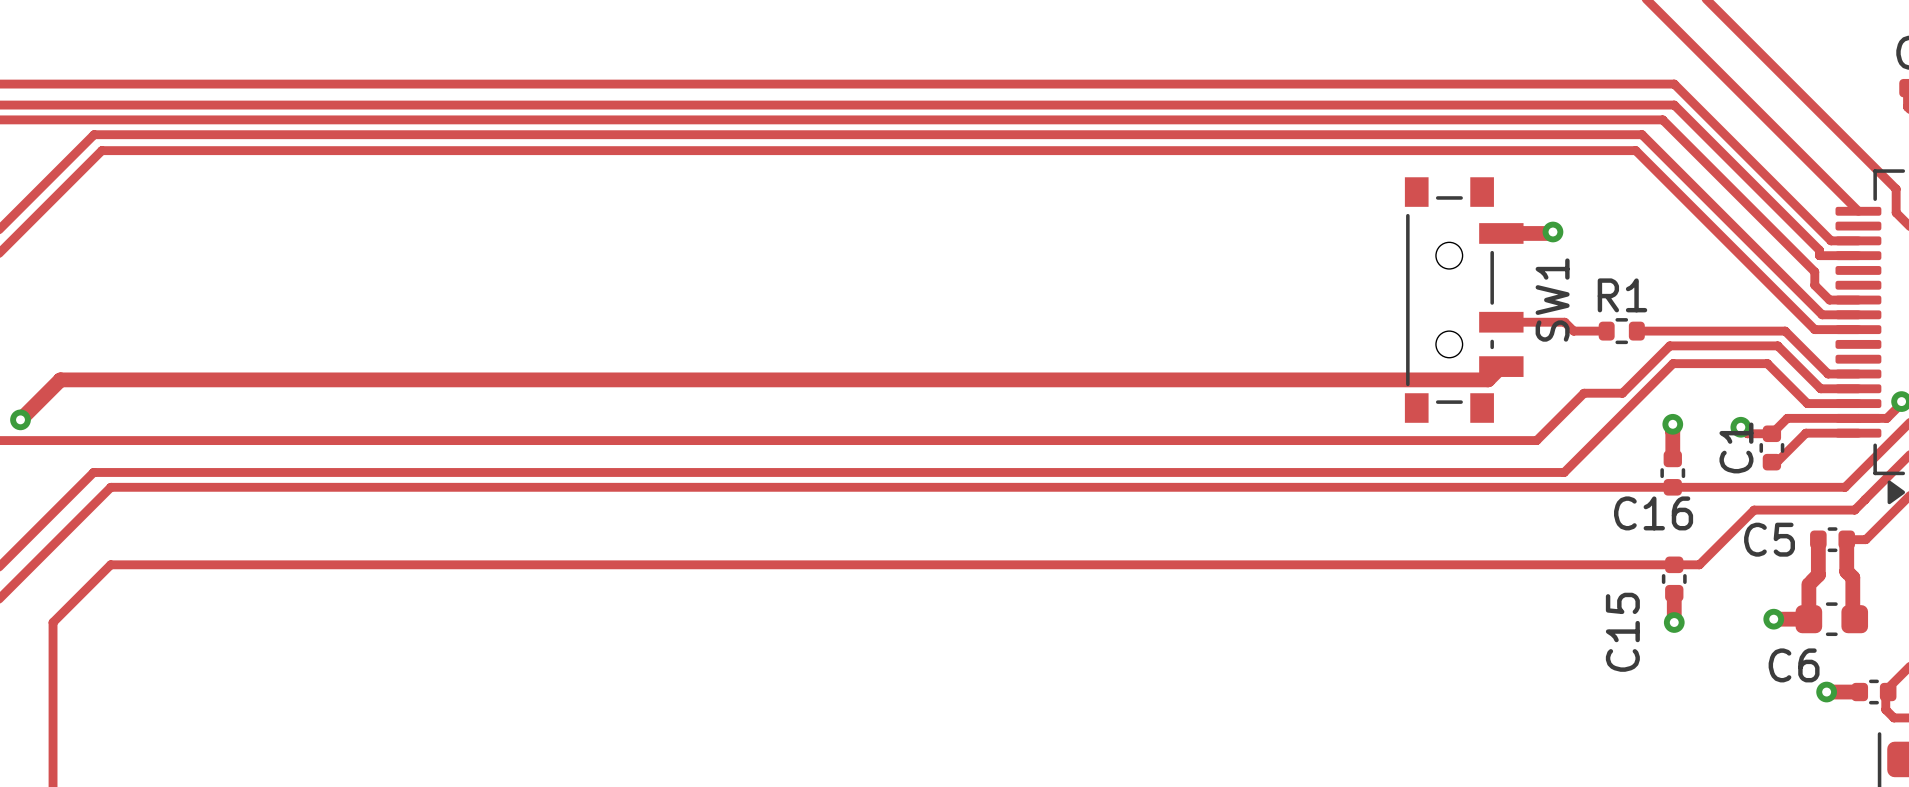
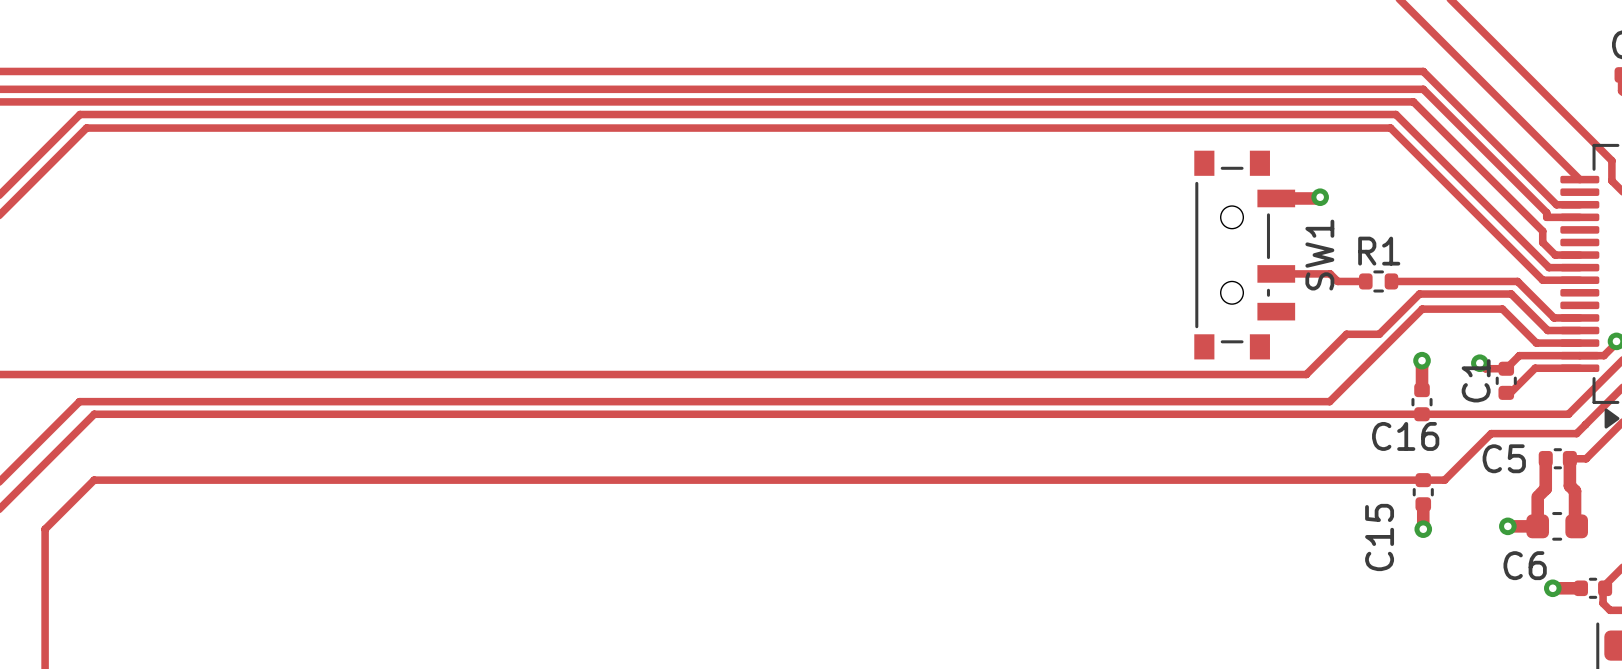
track: (1501, 366) (1488, 379) (60, 379) (20, 419) -> none
via: (20, 419) -> none

